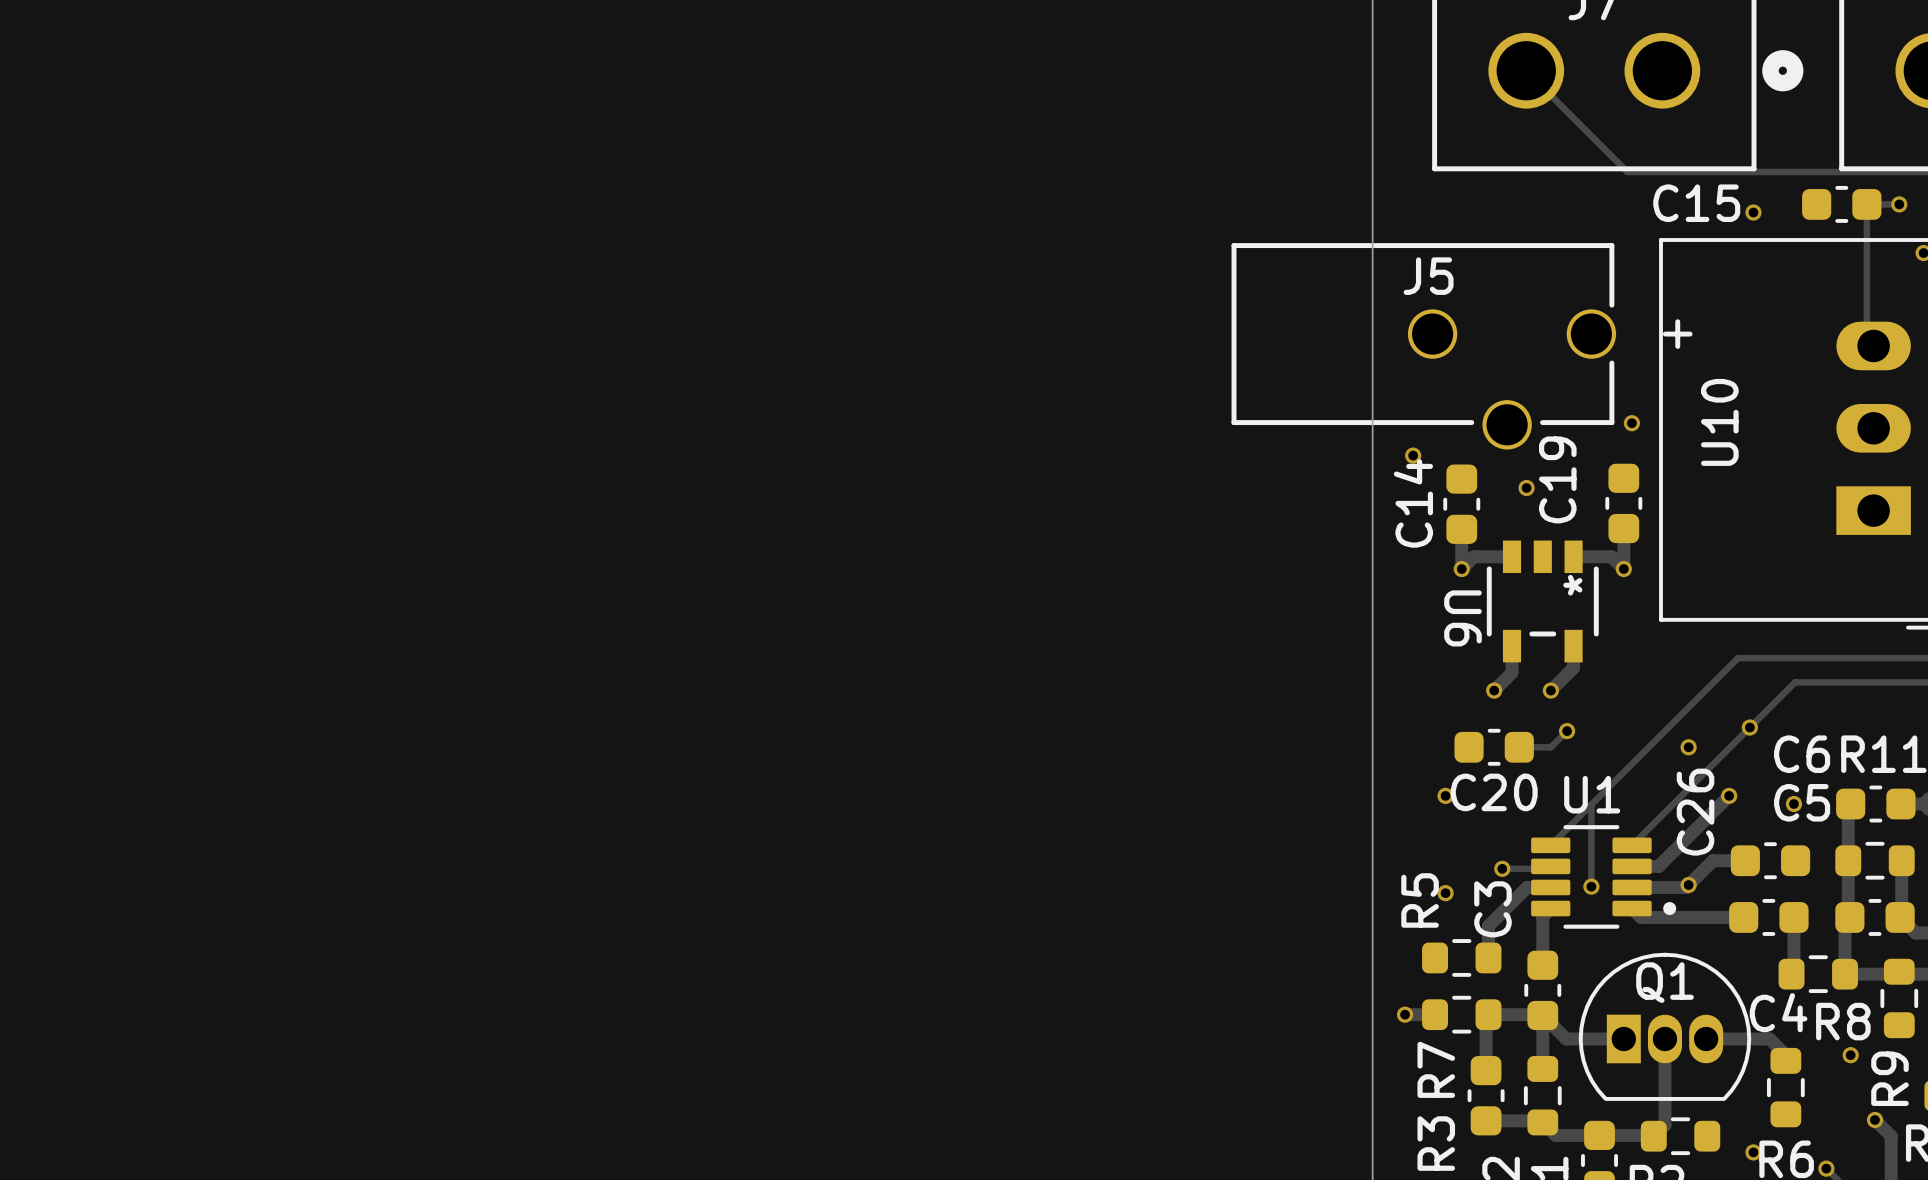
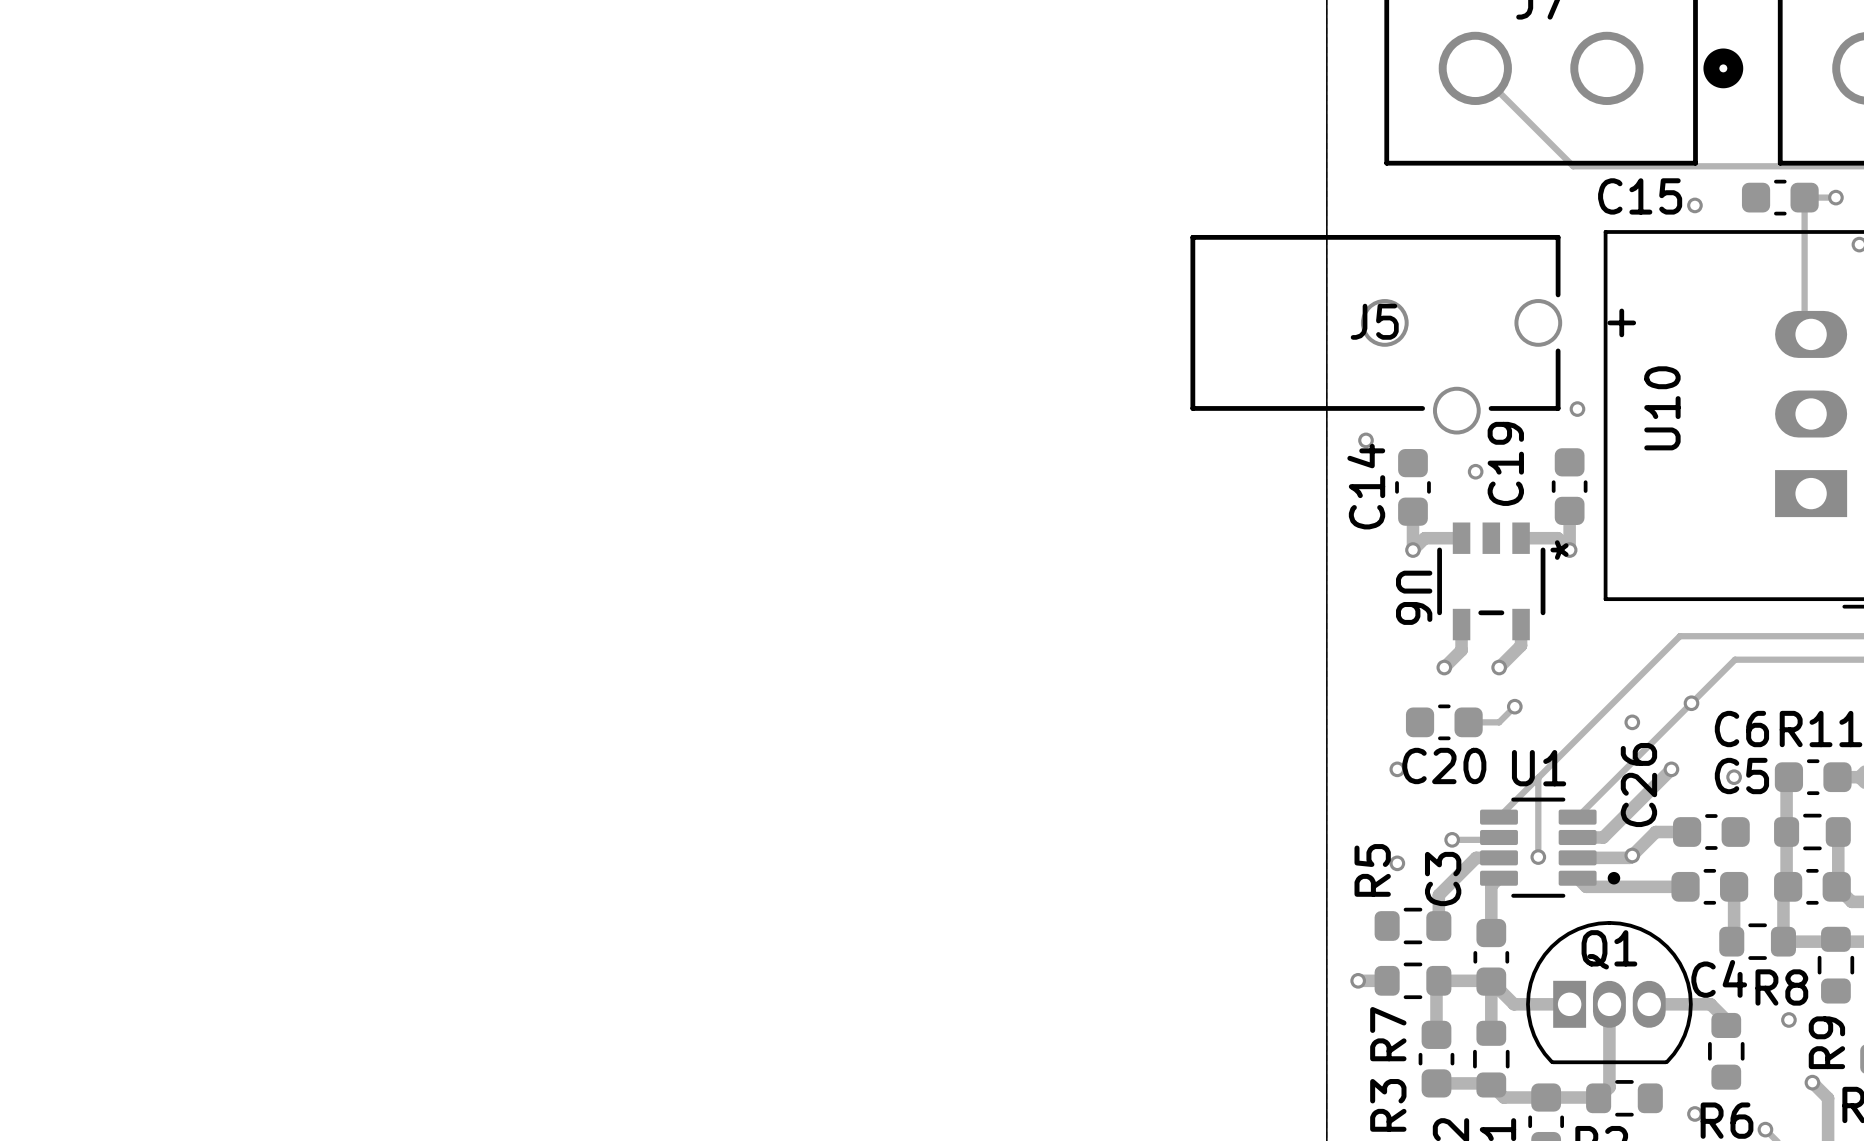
J5 name position: J5 (1428, 276) -> J5 (1374, 321)
U6 text position: * (1572, 585) -> * (1559, 550)

